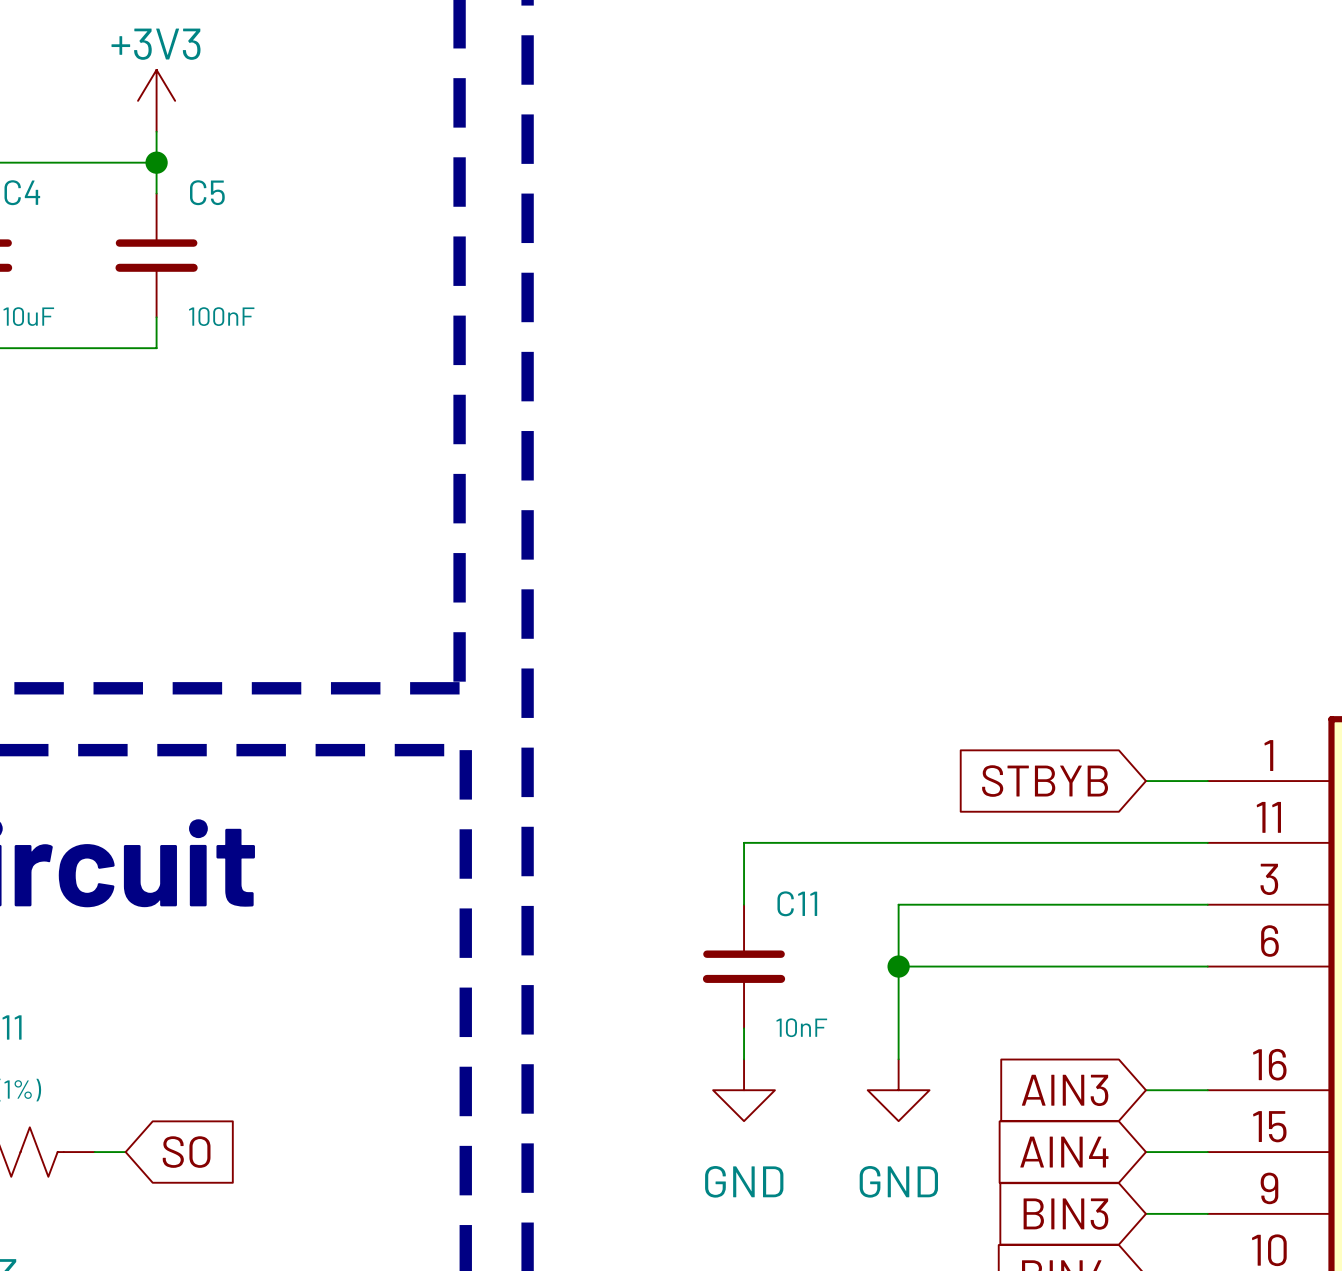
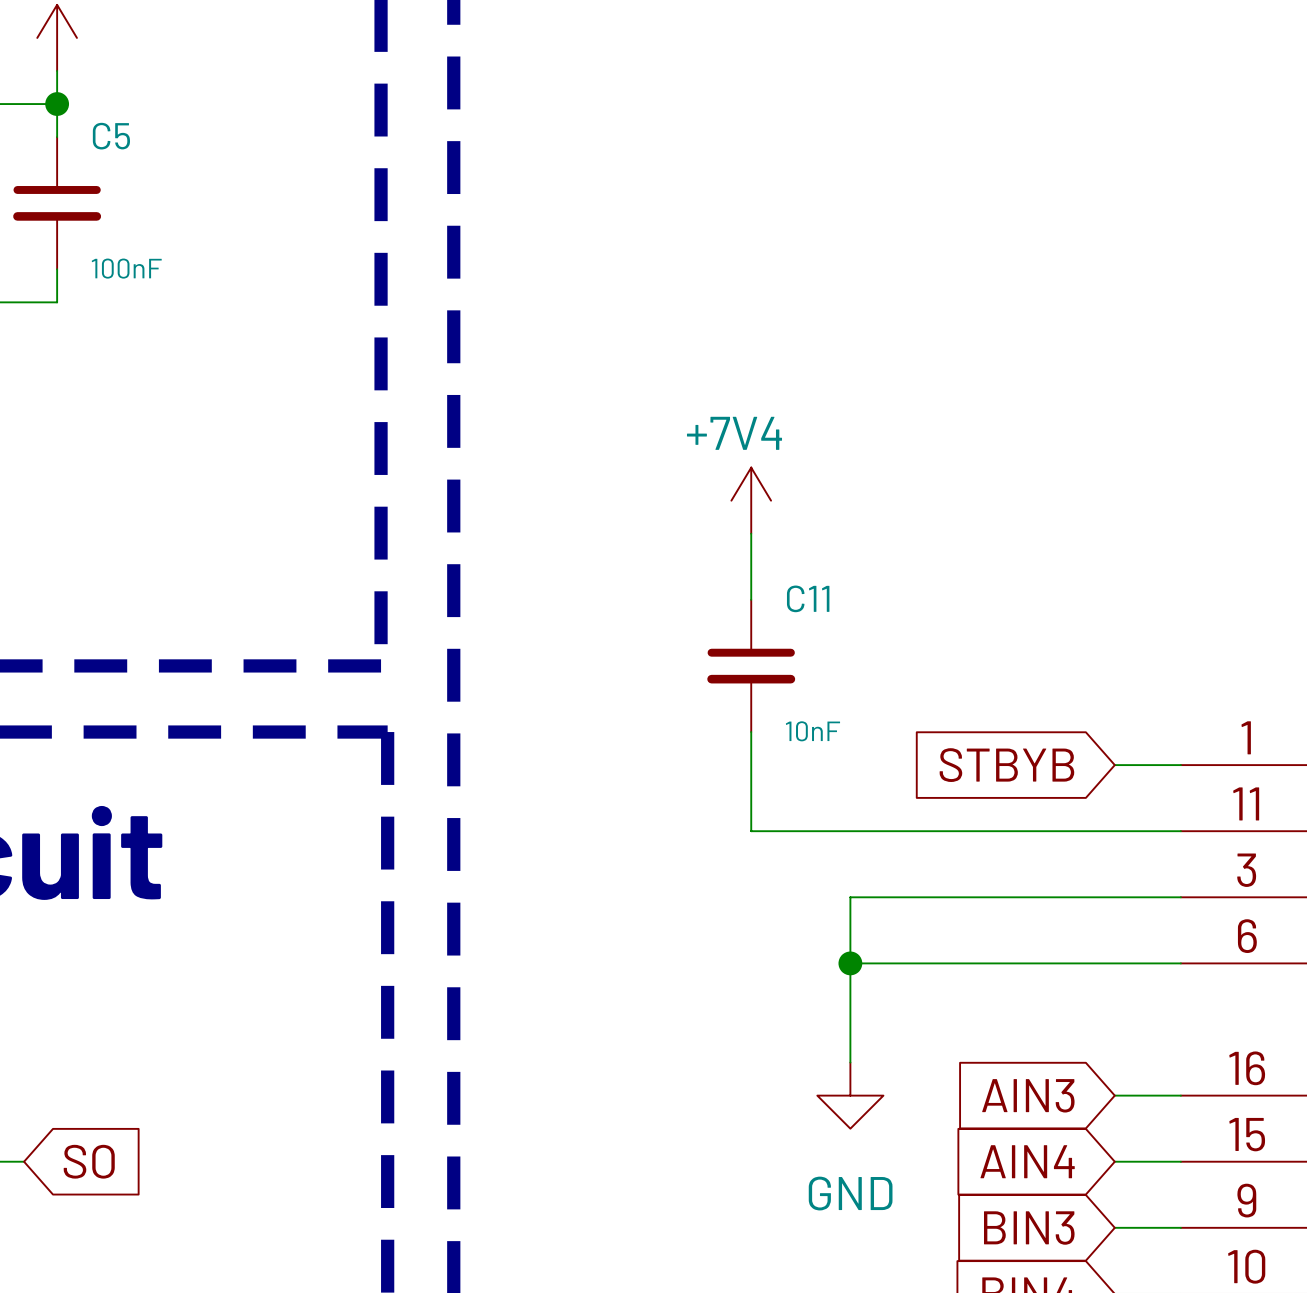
power symbol: none -> +7V4 (751, 500)
wire: none -> (751, 533) (751, 599)
wire: (805, 842) (744, 842) (744, 904) -> (751, 831) (751, 732)
C11 position: (744, 966) -> (751, 665)
wire: (744, 1028) (744, 1059) -> none
power symbol: GND (744, 1090) -> none

